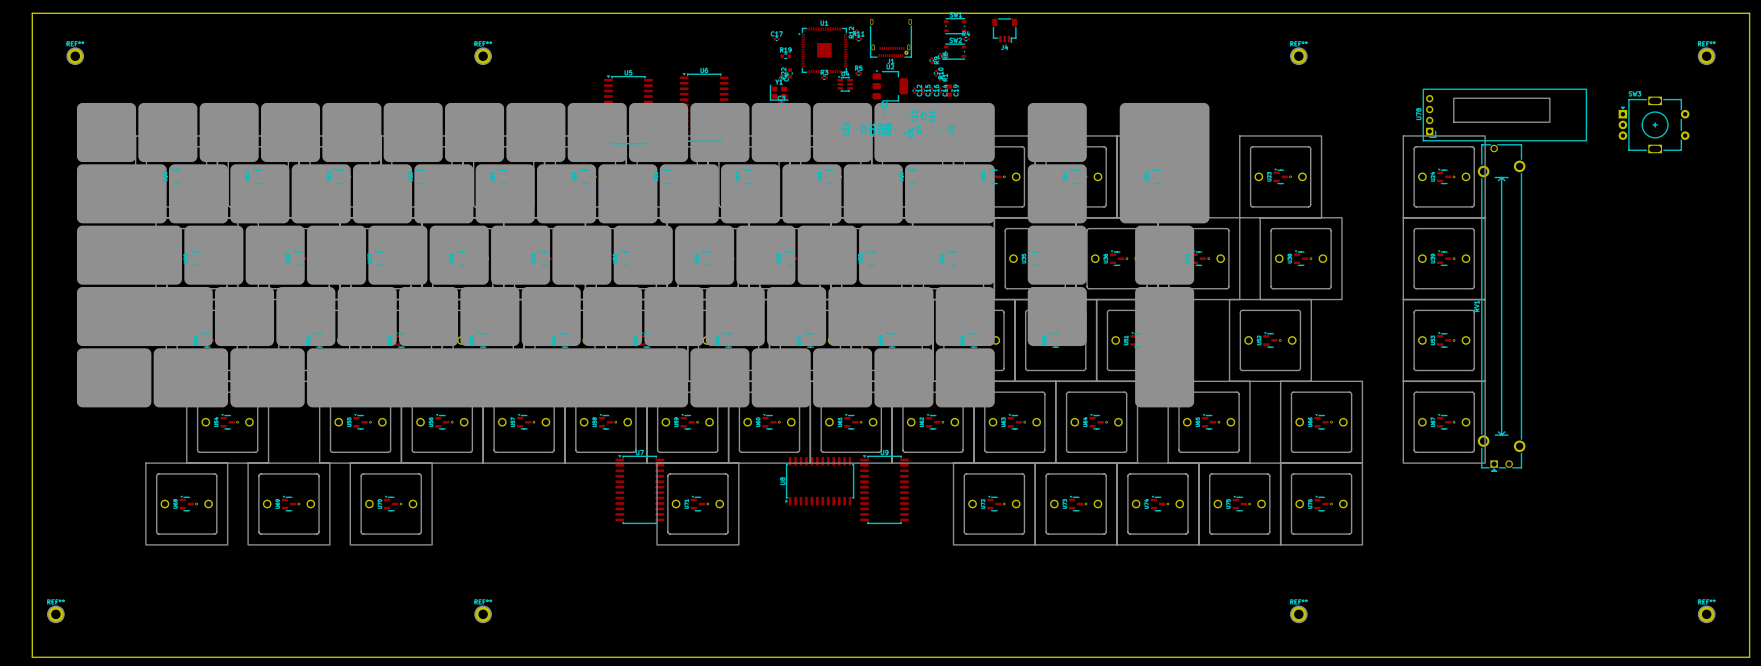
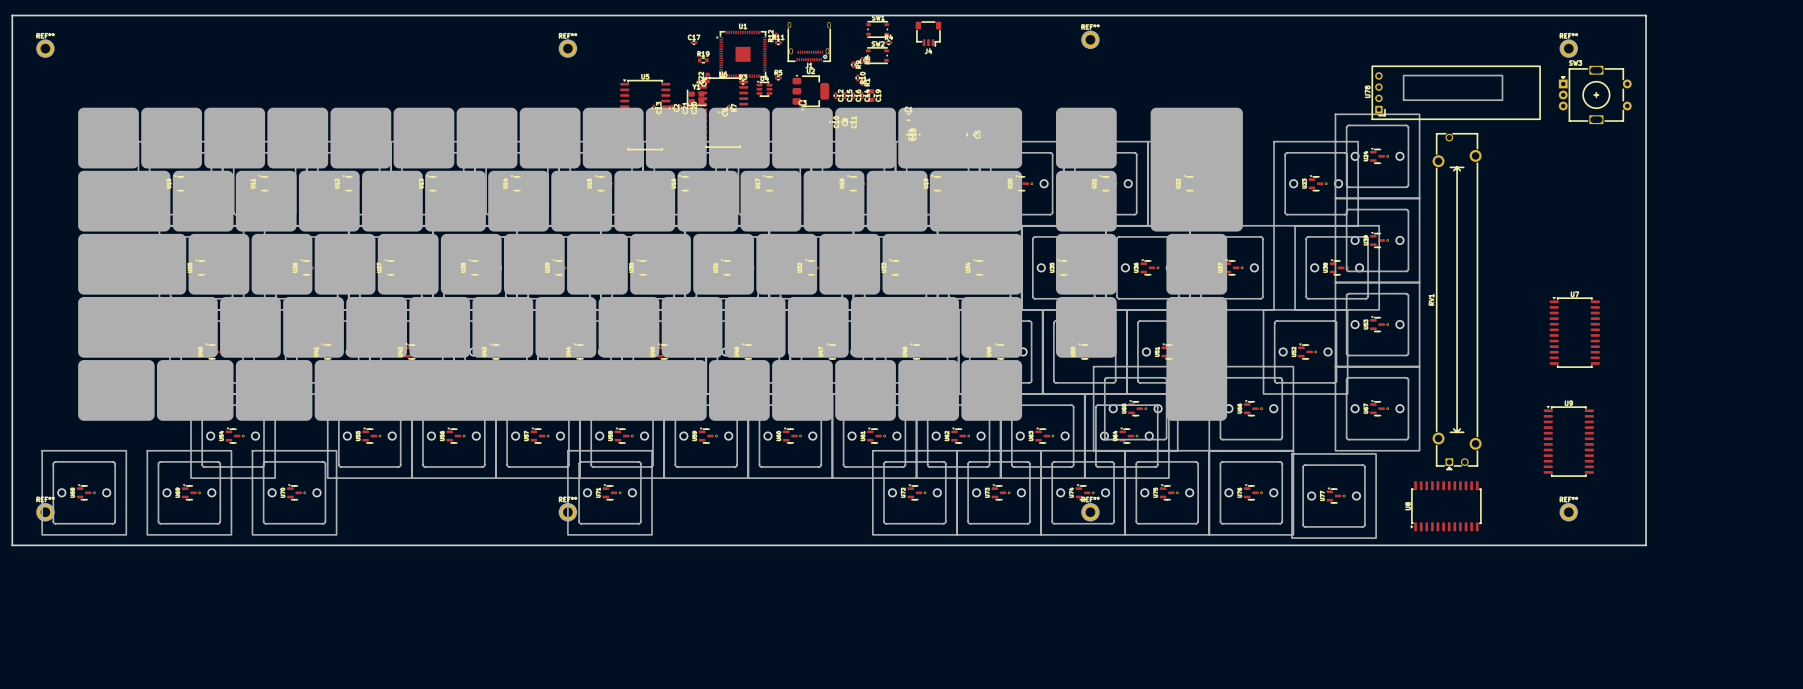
board edge: (32, 13) (32, 657) (1749, 657) (1749, 13) (1601, 13) -> (32, 15) (12, 15) (12, 545) (1646, 545) (1646, 15)
part position: (955, 26) -> (877, 29)
part position: (1004, 30) -> (928, 33)
part position: (856, 32) -> (776, 36)
part: none -> (1090, 39)
part position: (890, 38) -> (809, 41)
part position: (776, 39) -> (694, 42)
part position: (858, 39) -> (778, 42)
part position: (966, 39) -> (888, 42)
part: none -> (1568, 48)
part position: (822, 50) -> (741, 54)
part position: (955, 51) -> (877, 55)
part position: (75, 56) -> (45, 48)
part position: (483, 56) -> (567, 48)
part position: (785, 56) -> (703, 60)
part position: (940, 56) -> (862, 60)
part: (1298, 56) -> none
part: (1706, 56) -> none
part position: (931, 60) -> (853, 64)
part position: (790, 73) -> (707, 78)
part position: (858, 73) -> (778, 78)
part position: (936, 73) -> (857, 78)
part position: (781, 77) -> (698, 82)
part position: (824, 77) -> (743, 82)
part position: (940, 77) -> (862, 82)
part position: (845, 83) -> (764, 88)
part position: (890, 85) -> (810, 90)
part position: (914, 90) -> (835, 95)
part position: (923, 90) -> (844, 95)
part position: (931, 90) -> (853, 95)
part position: (940, 90) -> (862, 95)
part position: (948, 90) -> (871, 95)
part position: (779, 92) -> (696, 97)
part position: (1504, 115) -> (1456, 92)
part position: (910, 116) -> (831, 122)
part position: (918, 116) -> (840, 122)
part position: (927, 116) -> (848, 122)
part position: (1654, 124) -> (1595, 94)
part position: (841, 129) -> (653, 108)
part position: (858, 129) -> (671, 108)
part position: (867, 129) -> (680, 108)
part position: (875, 129) -> (689, 108)
part position: (914, 129) -> (728, 108)
part position: (905, 133) -> (720, 112)
part position: (1444, 176) -> (1377, 156)
part position: (1444, 258) -> (1377, 240)
part position: (1501, 308) -> (1457, 301)
part position: (1444, 340) -> (1377, 324)
part position: (1209, 422) -> (1135, 408)
part position: (1321, 422) -> (1251, 408)
part position: (1444, 422) -> (1377, 408)
part: none -> (1334, 496)
part position: (819, 481) -> (1445, 506)
part position: (639, 489) -> (1574, 332)
part position: (884, 489) -> (1568, 441)
part: none -> (45, 512)
part: none -> (567, 512)
part: none -> (1090, 512)
part: none -> (1568, 512)
part position: (186, 504) -> (84, 492)
part position: (288, 504) -> (189, 492)
part position: (391, 504) -> (294, 492)
part position: (697, 504) -> (609, 492)
part position: (994, 504) -> (914, 492)
part position: (1076, 504) -> (999, 492)
part position: (1157, 504) -> (1083, 492)
part position: (1239, 504) -> (1167, 492)
part position: (1321, 504) -> (1251, 492)
part: (55, 614) -> none
part: (483, 614) -> none
part: (1298, 614) -> none
part: (1706, 614) -> none

